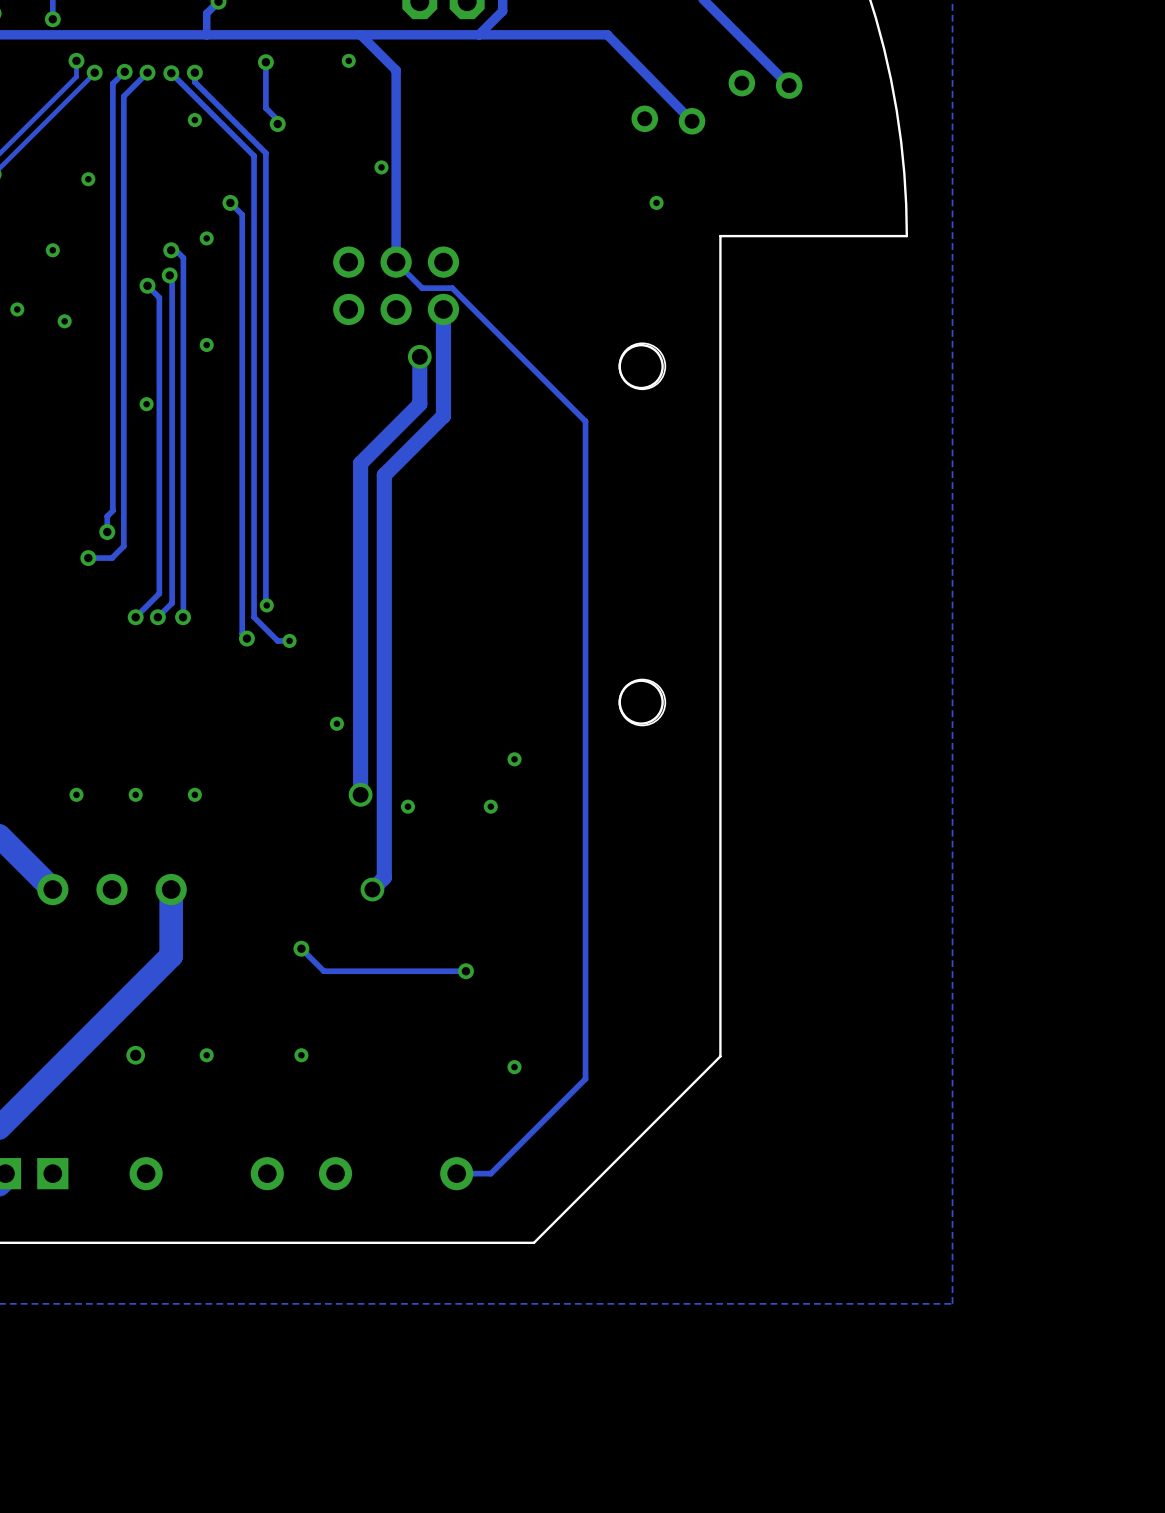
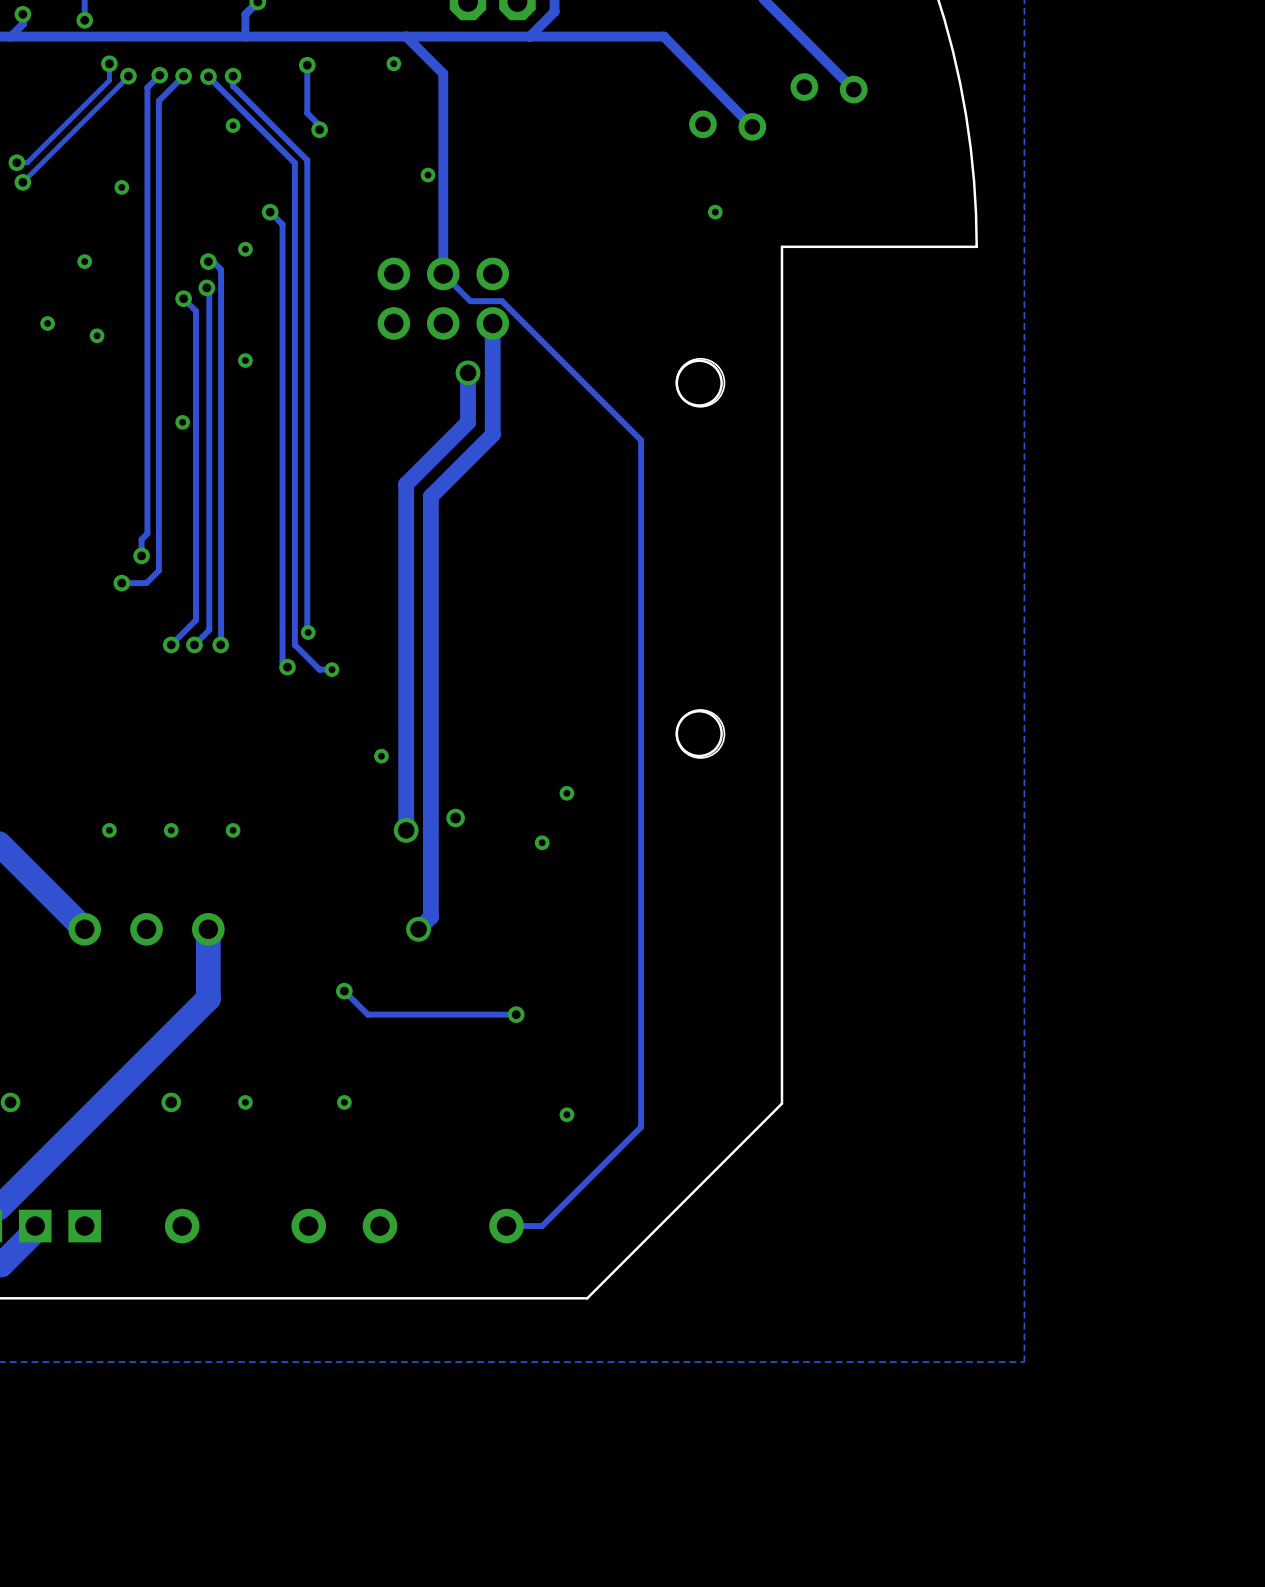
via: none -> (455, 818)
via: (407, 806) -> none

